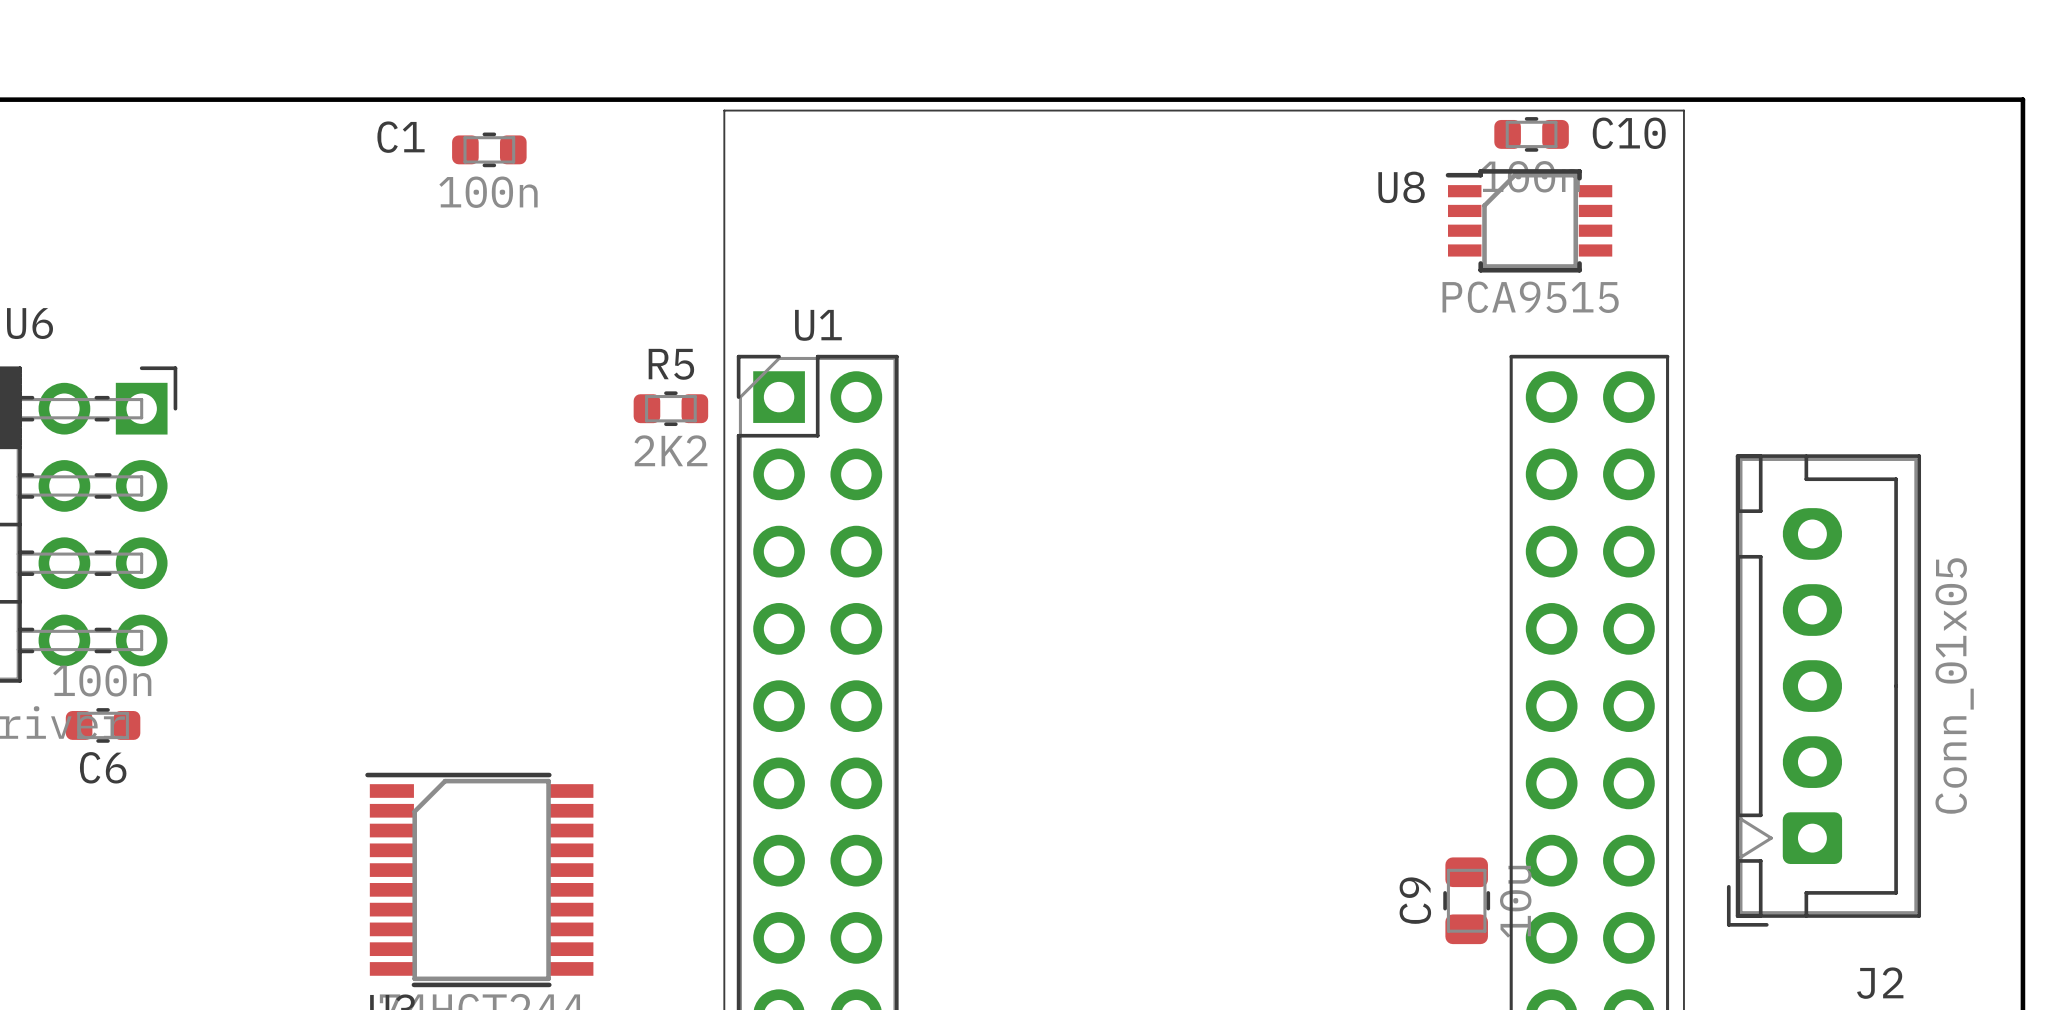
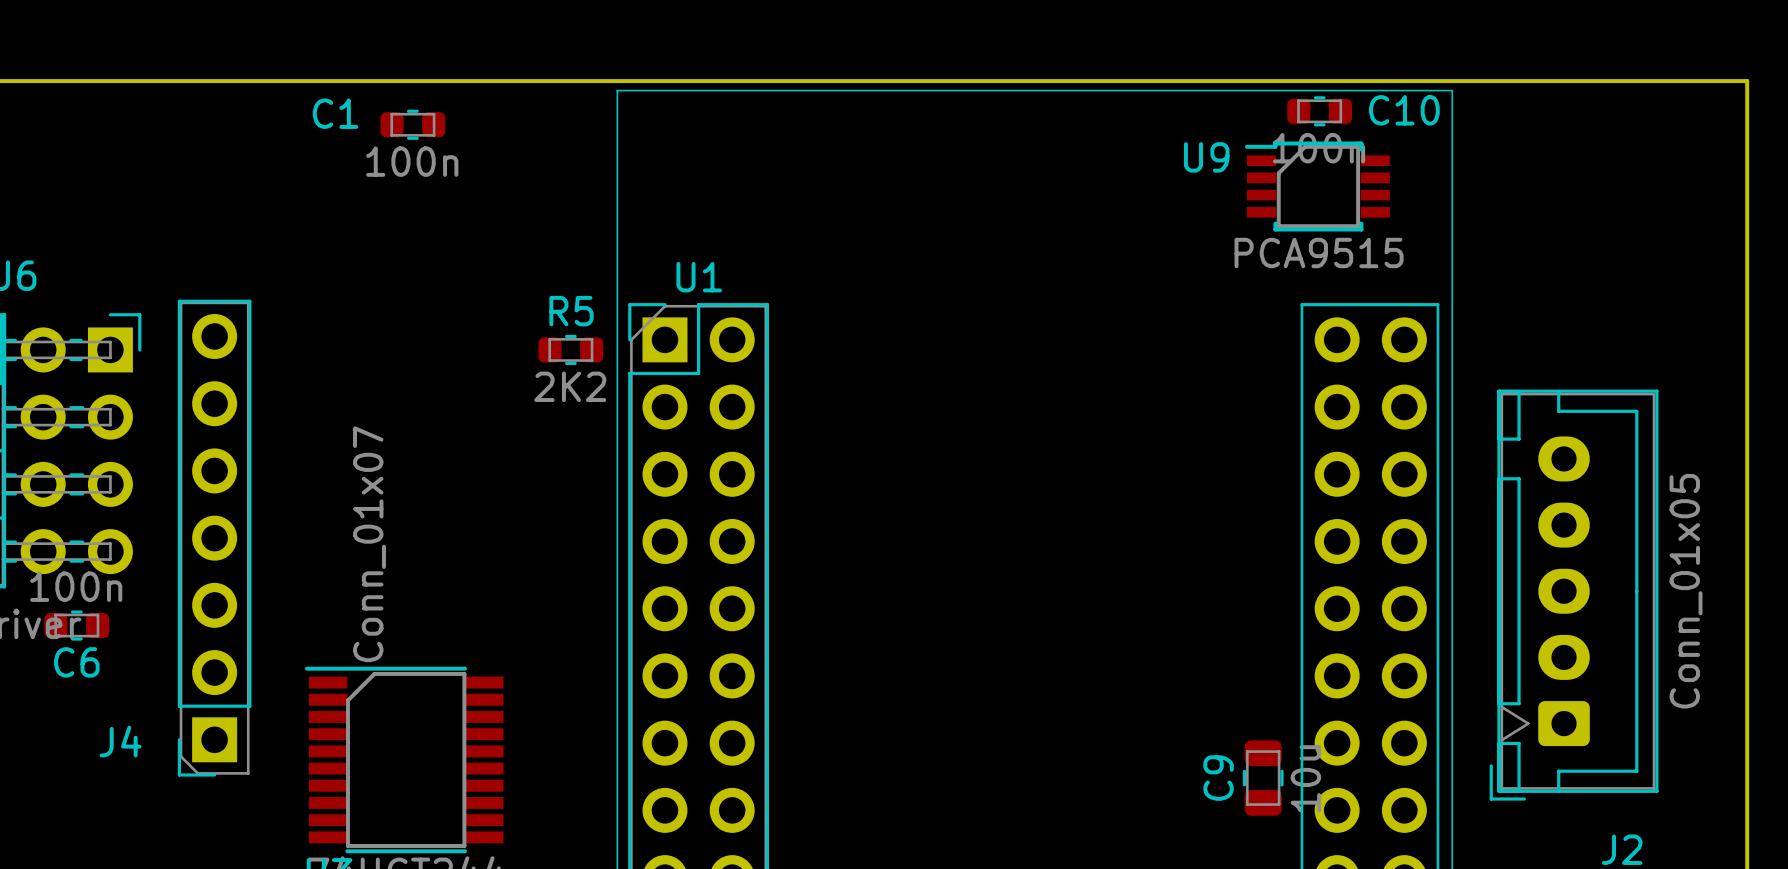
U8 name: U8 (1401, 187) -> U9 (1206, 157)
J4: none -> Conn_01x07 (214, 538)

